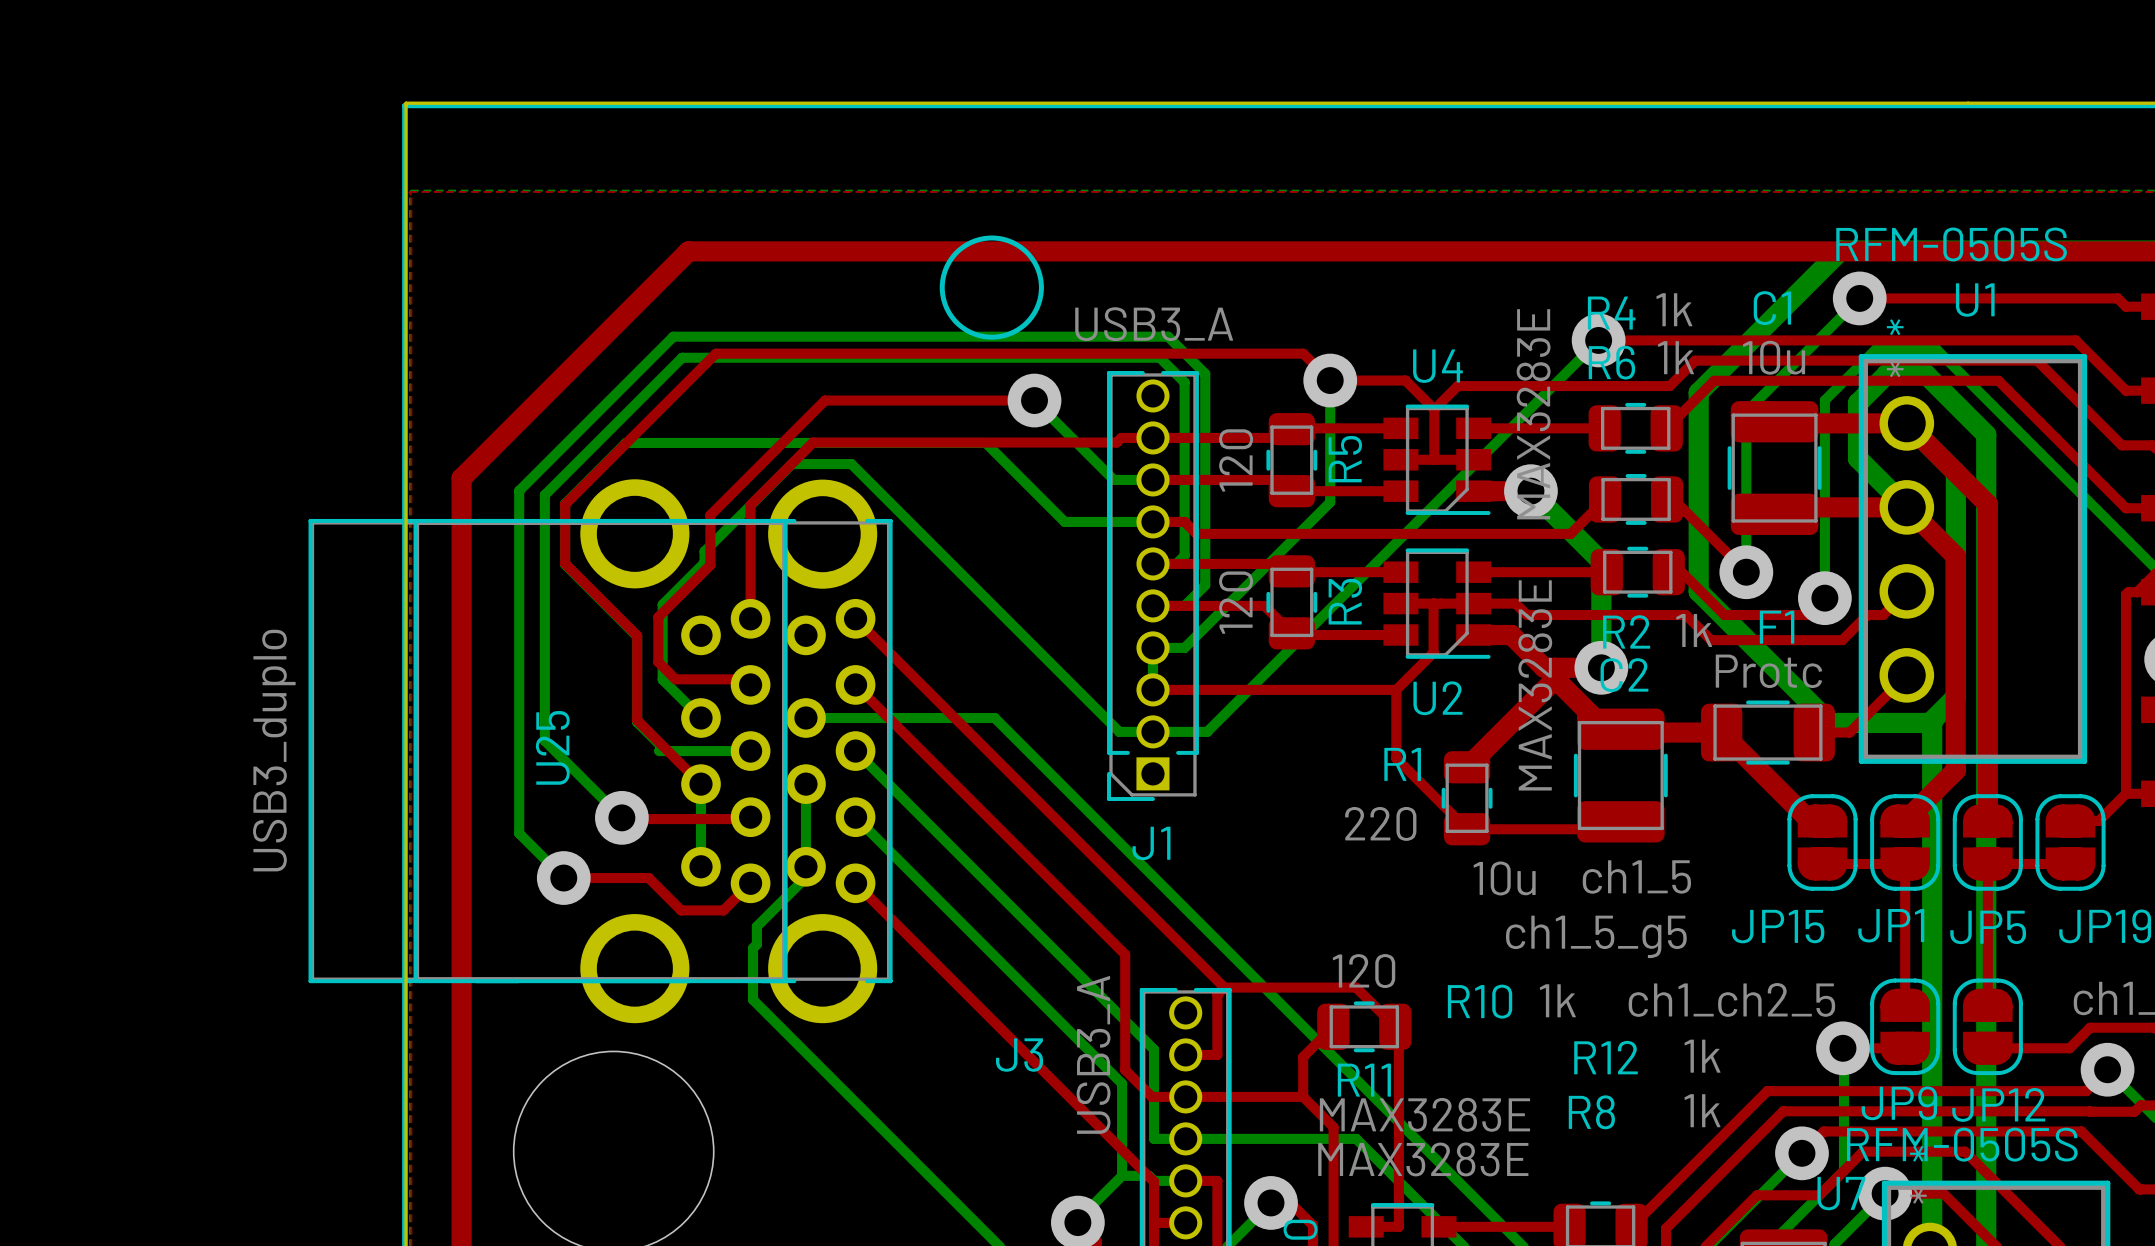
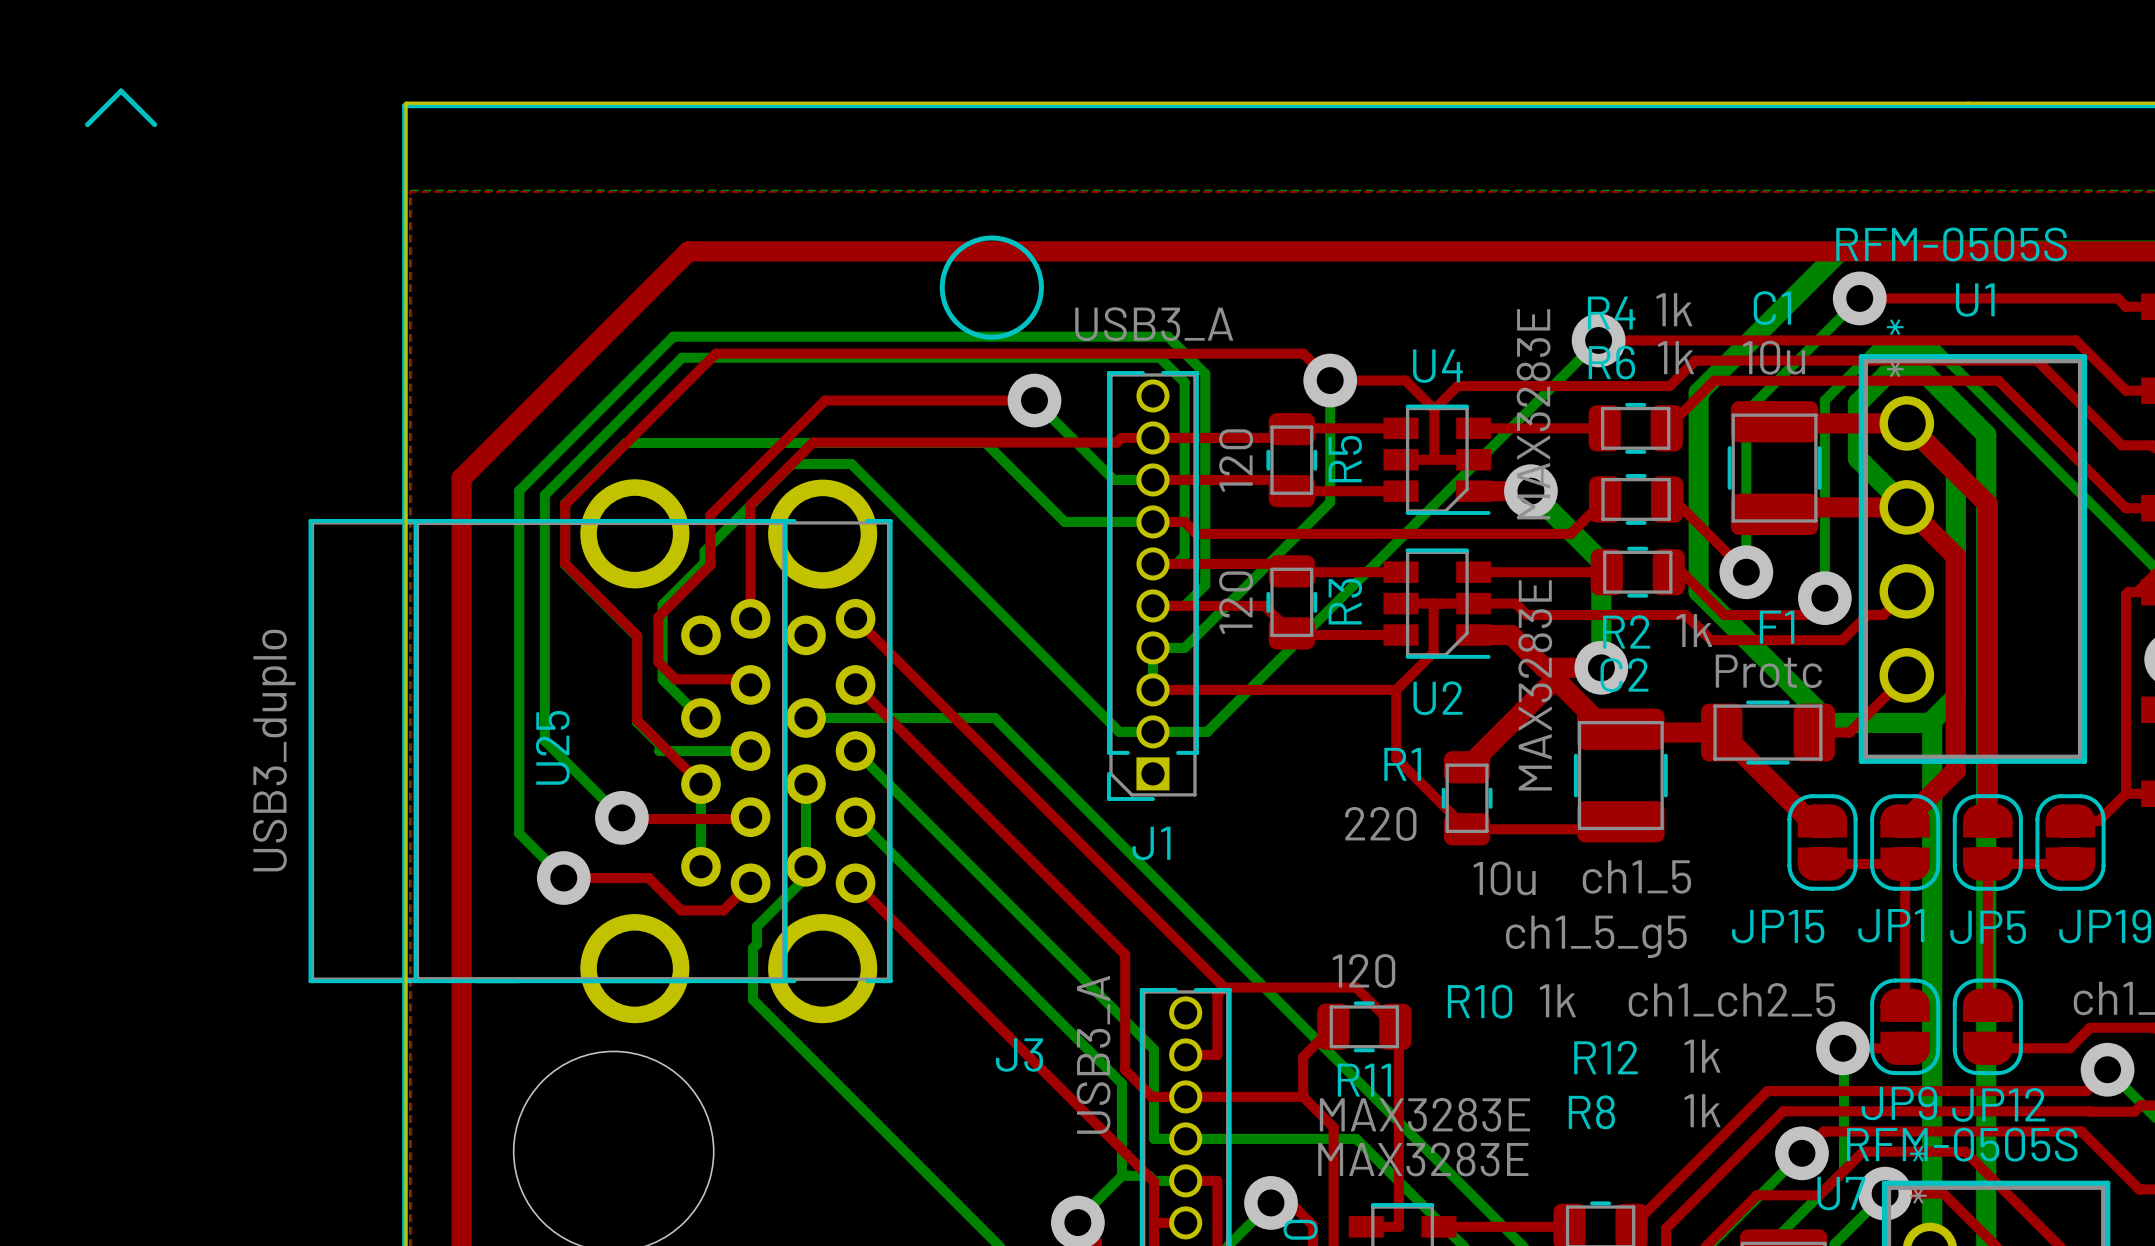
line: none -> (87, 124) (121, 91) (154, 124)

